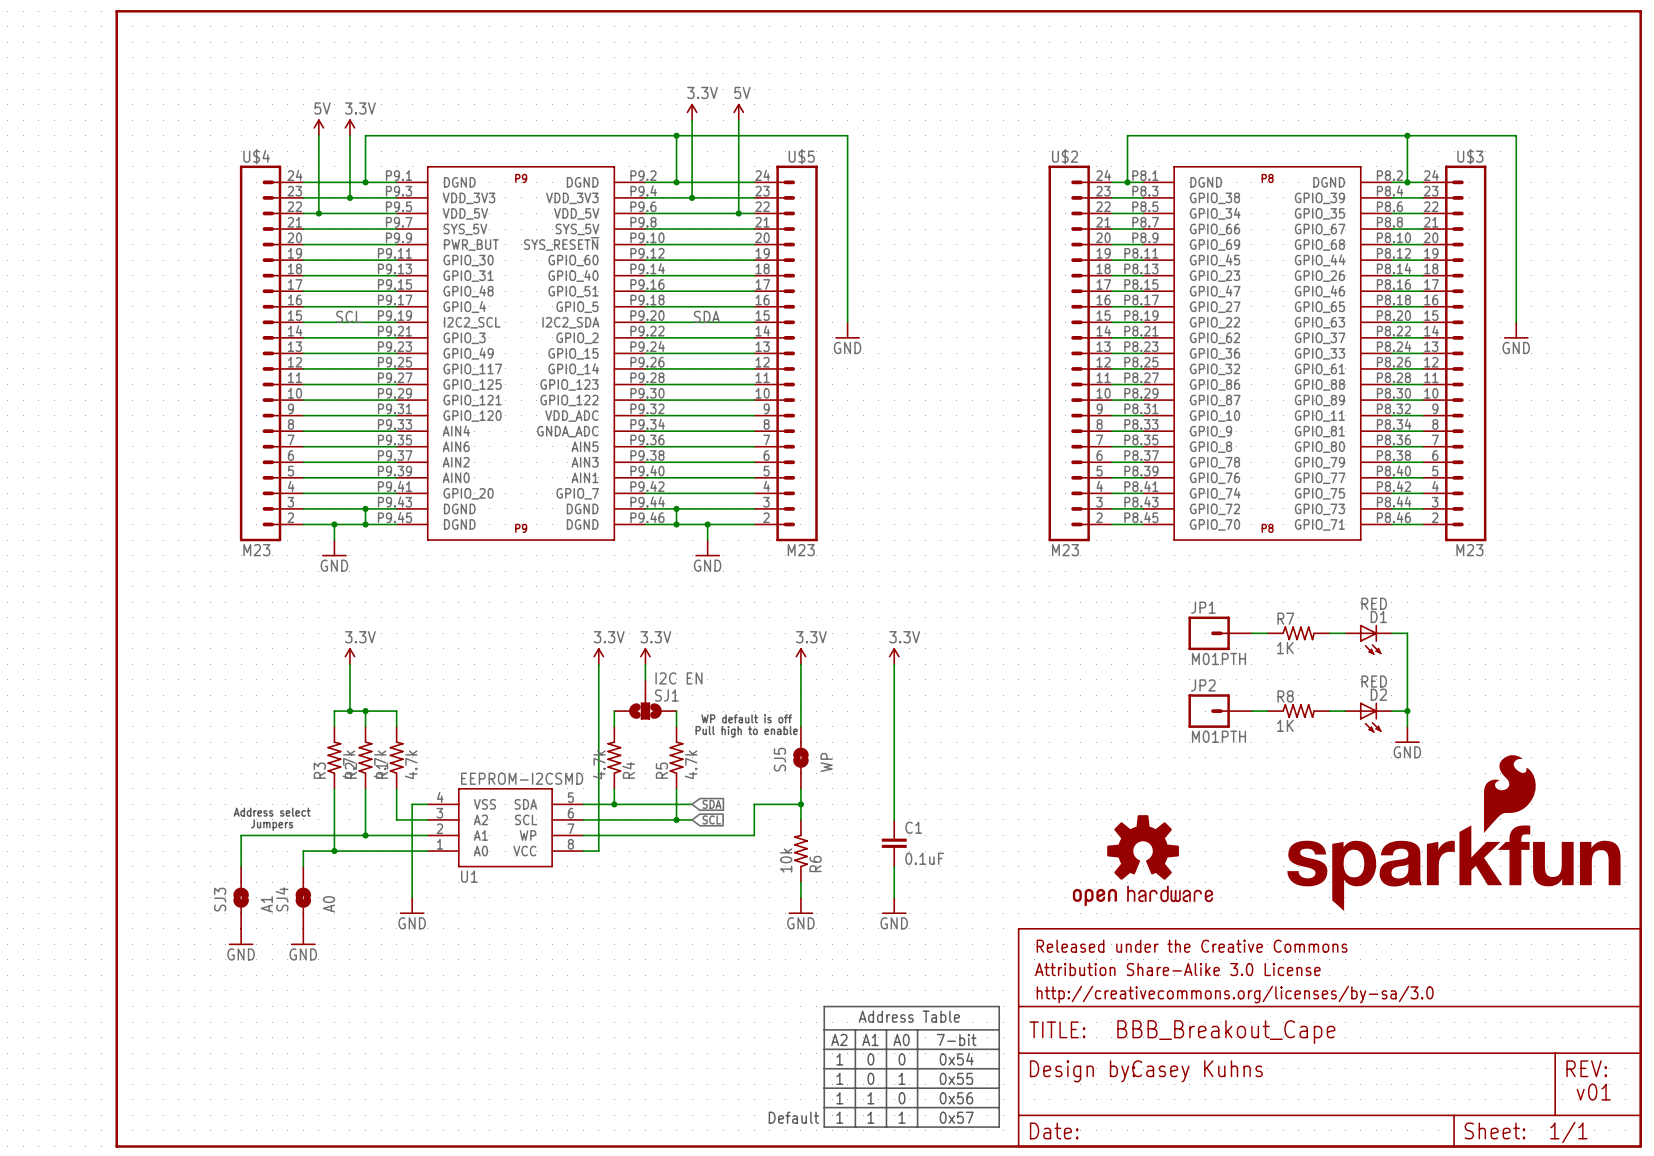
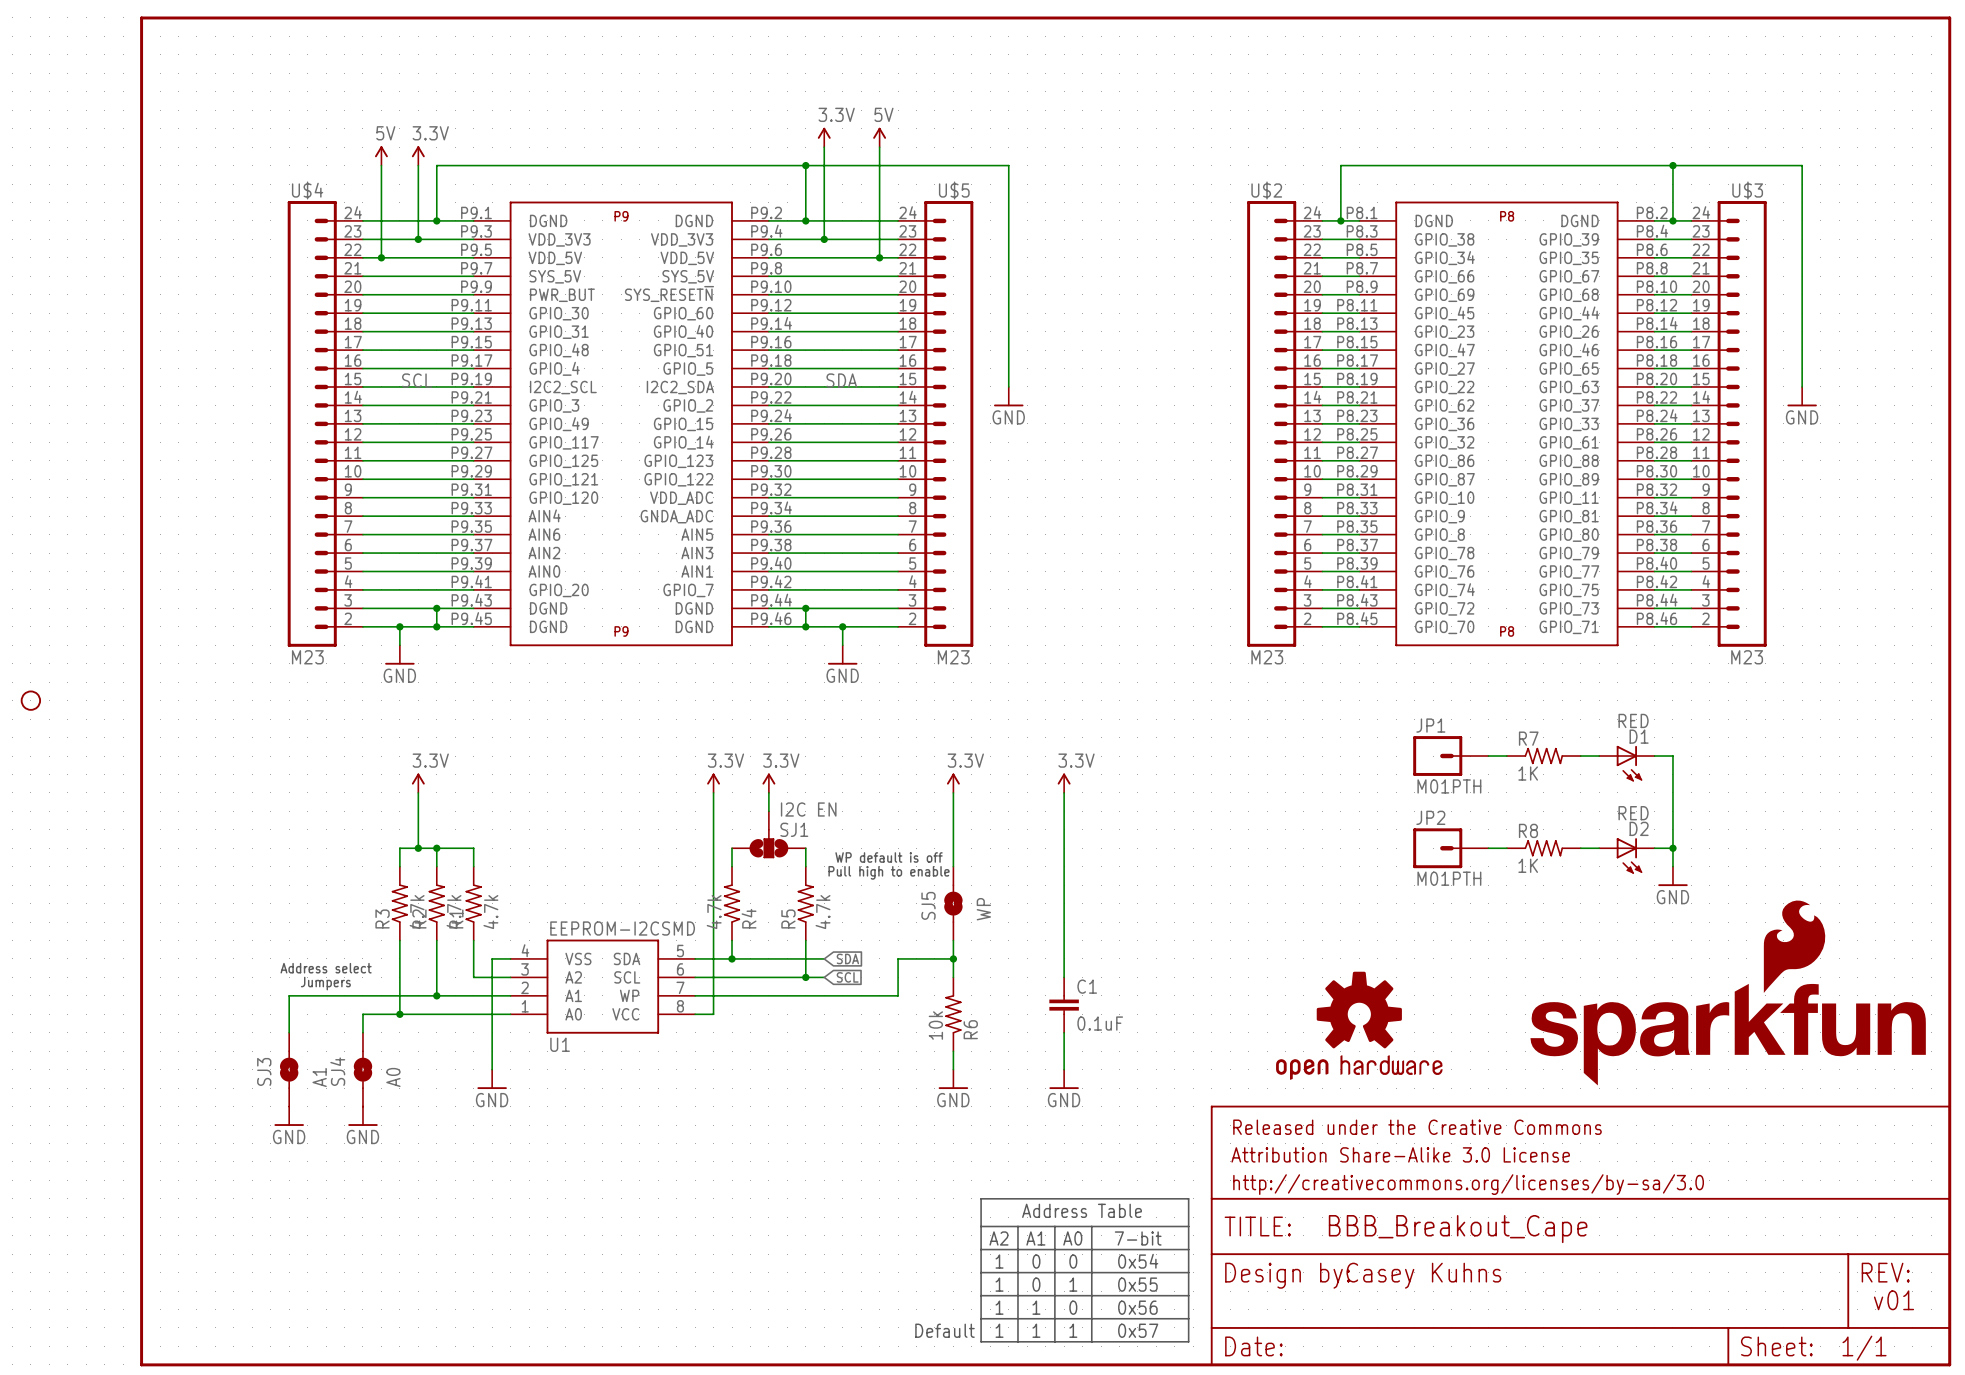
part: none -> (30, 700)

